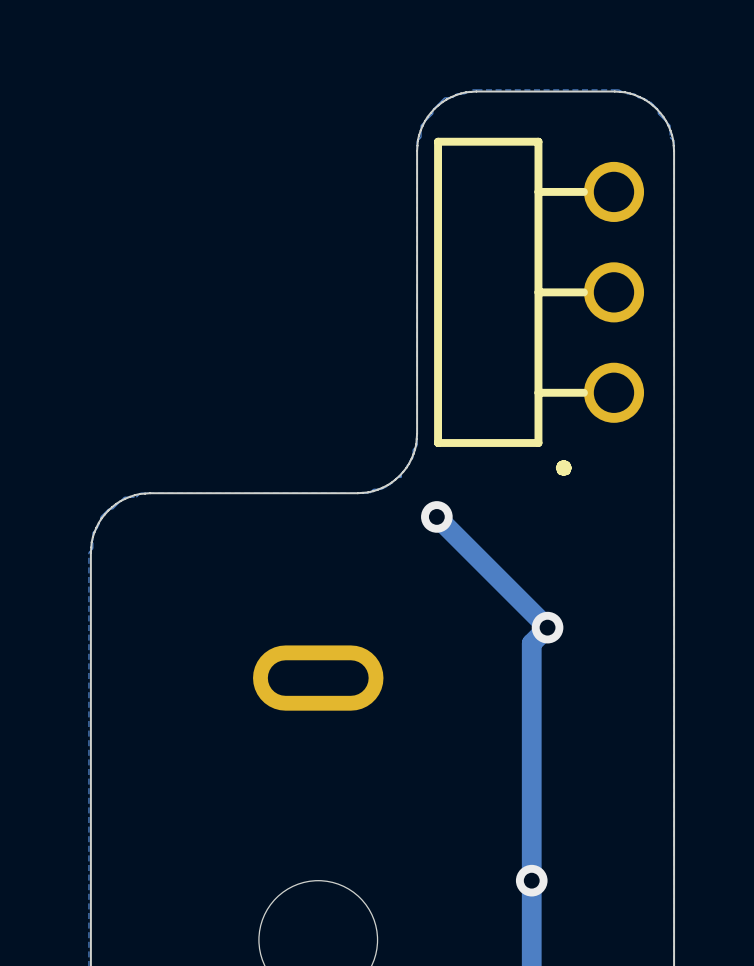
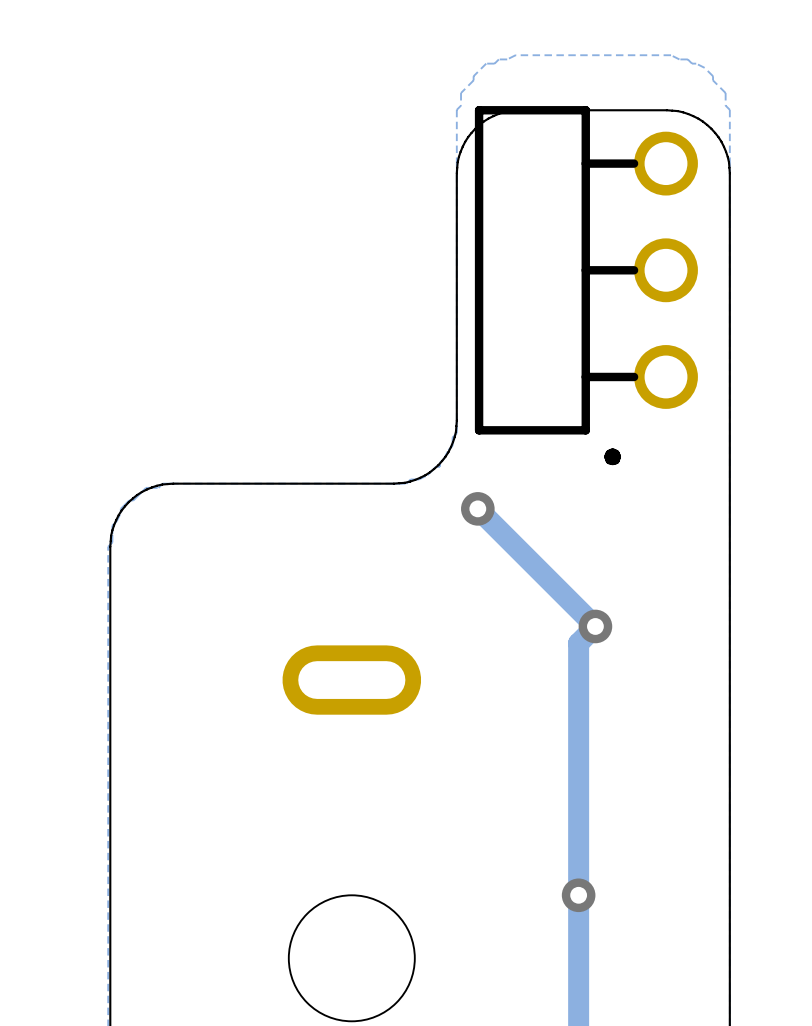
board edge: (674, 201) (673, 140) (666, 121) (656, 108) (644, 99) (630, 93) (614, 91) (476, 91) (460, 93) (446, 99) (427, 116) (419, 135) (417, 150) (417, 201) -> (729, 173) (726, 151) (718, 137) (711, 128) (702, 121) (688, 114) (666, 110) (519, 110) (503, 112) (483, 121) (468, 137) (458, 156) (456, 173)

